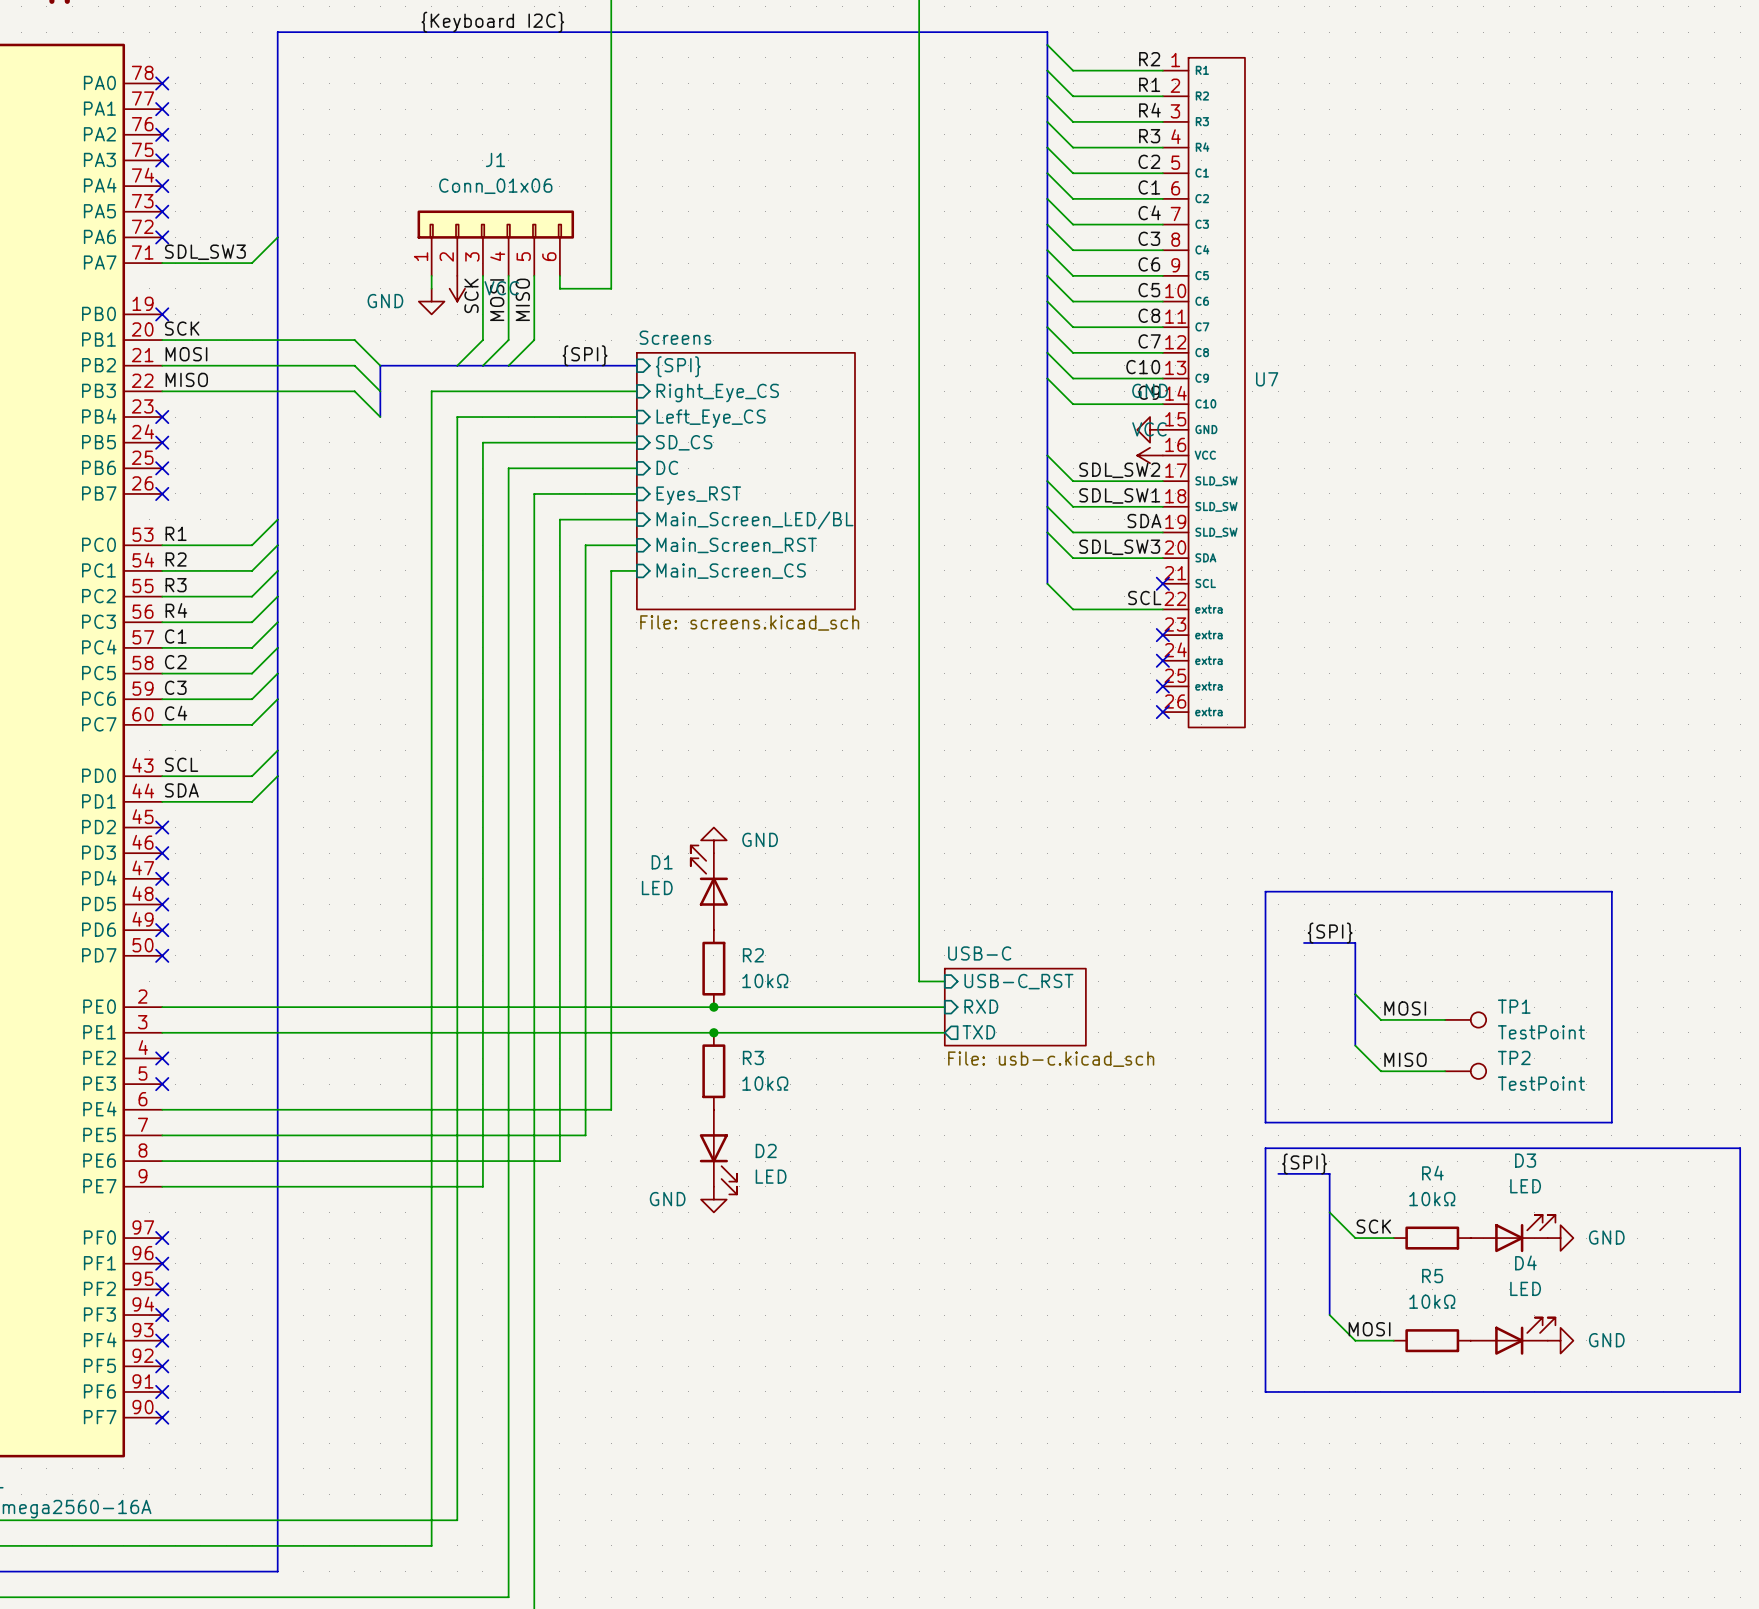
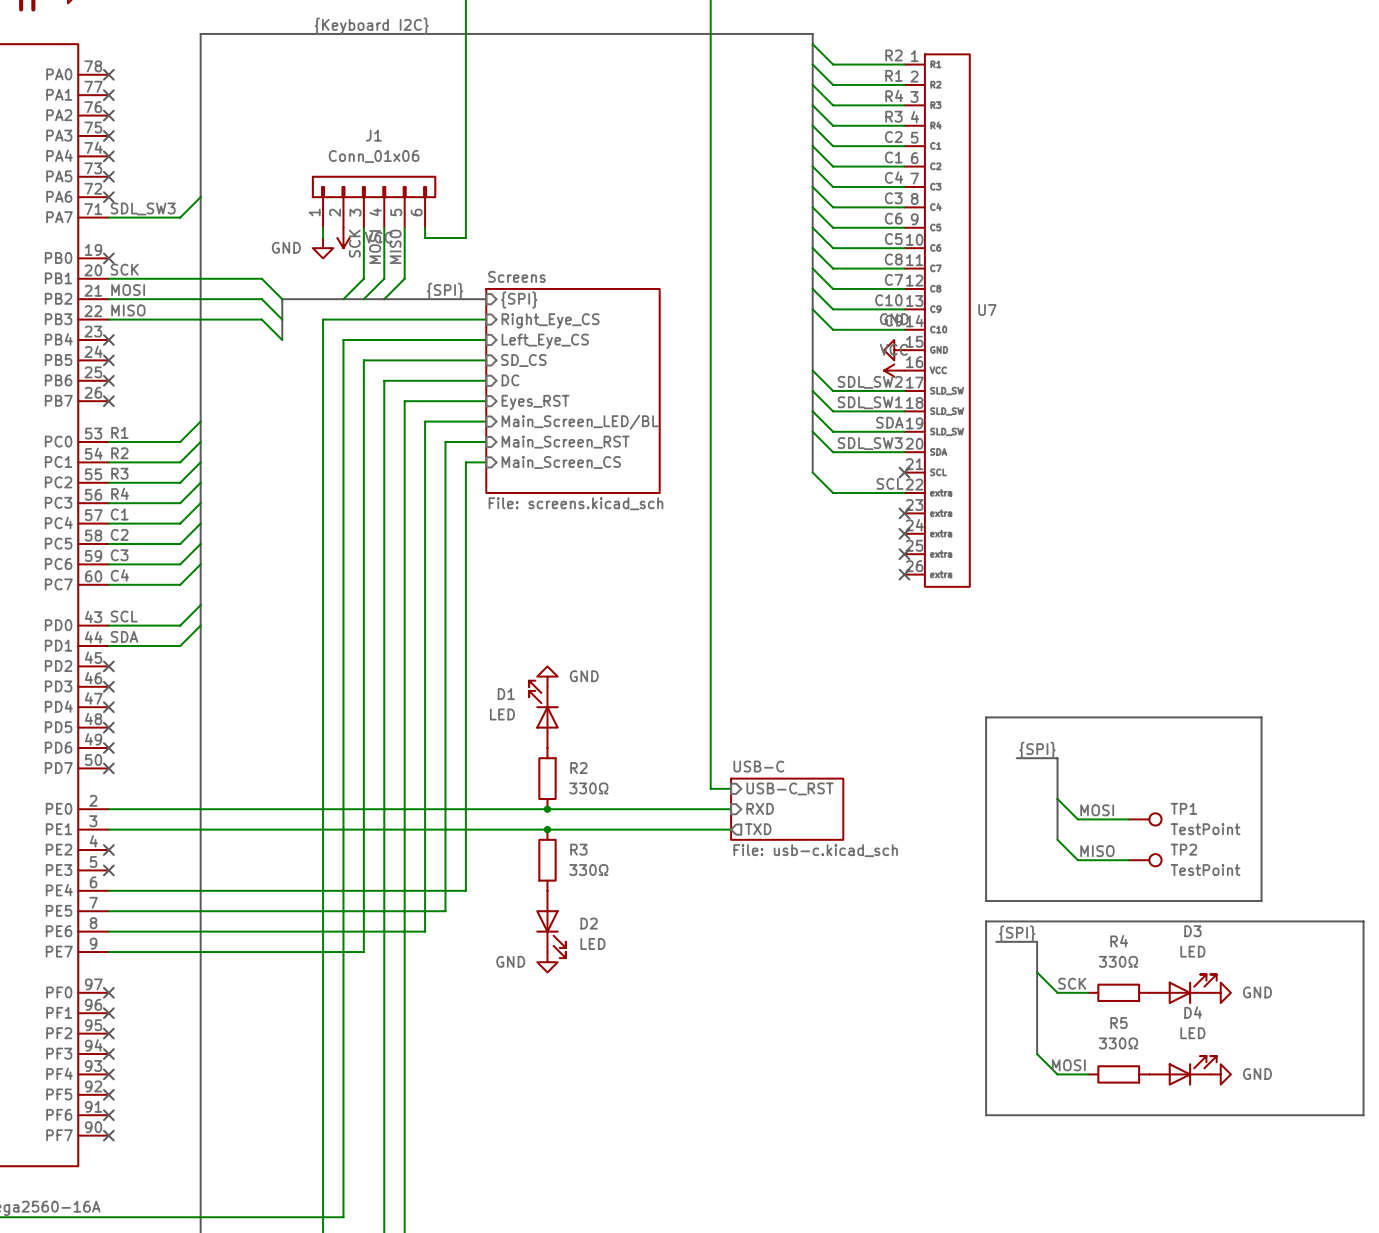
R2 value: 10kΩ (765, 980) -> 330Ω (588, 788)
R3 value: 10kΩ (765, 1083) -> 330Ω (588, 870)
R4 value: 10kΩ (1432, 1199) -> 330Ω (1118, 961)
R5 value: 10kΩ (1432, 1301) -> 330Ω (1118, 1043)

